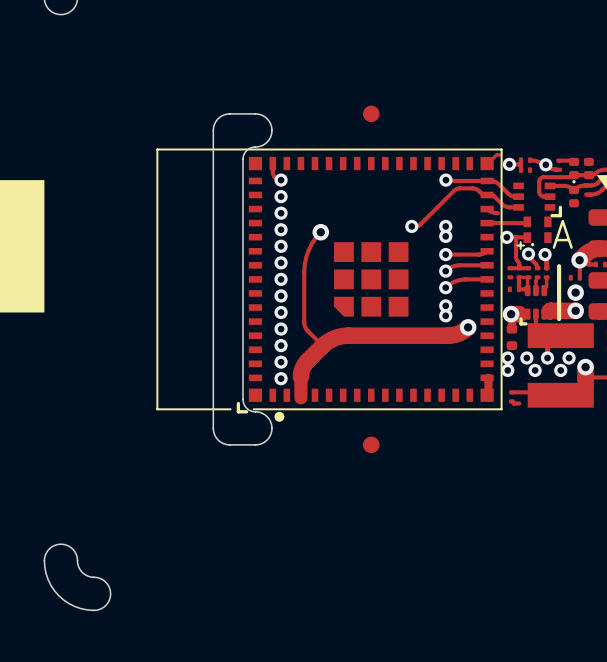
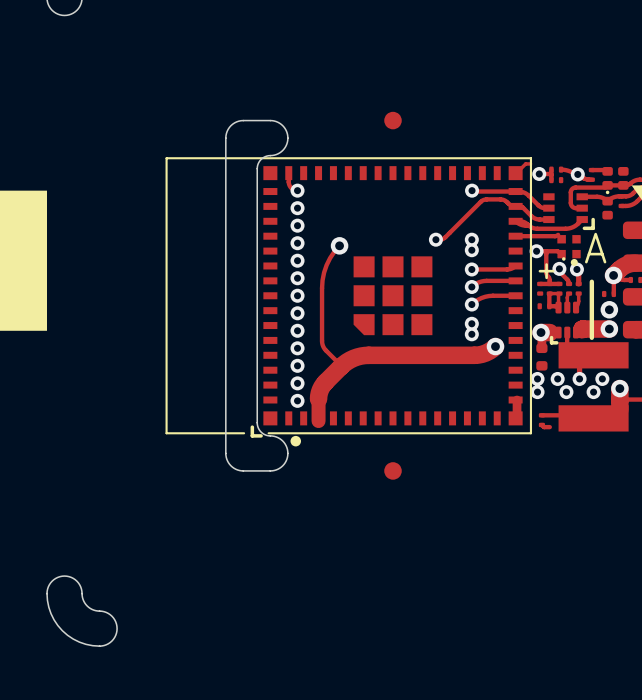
track: none -> (582, 219) (574, 226) (565, 228) (534, 228) (520, 221)
part footprint: [516, 216, 552, 250] -> [557, 235, 581, 266]
text: none -> + (546, 271)

